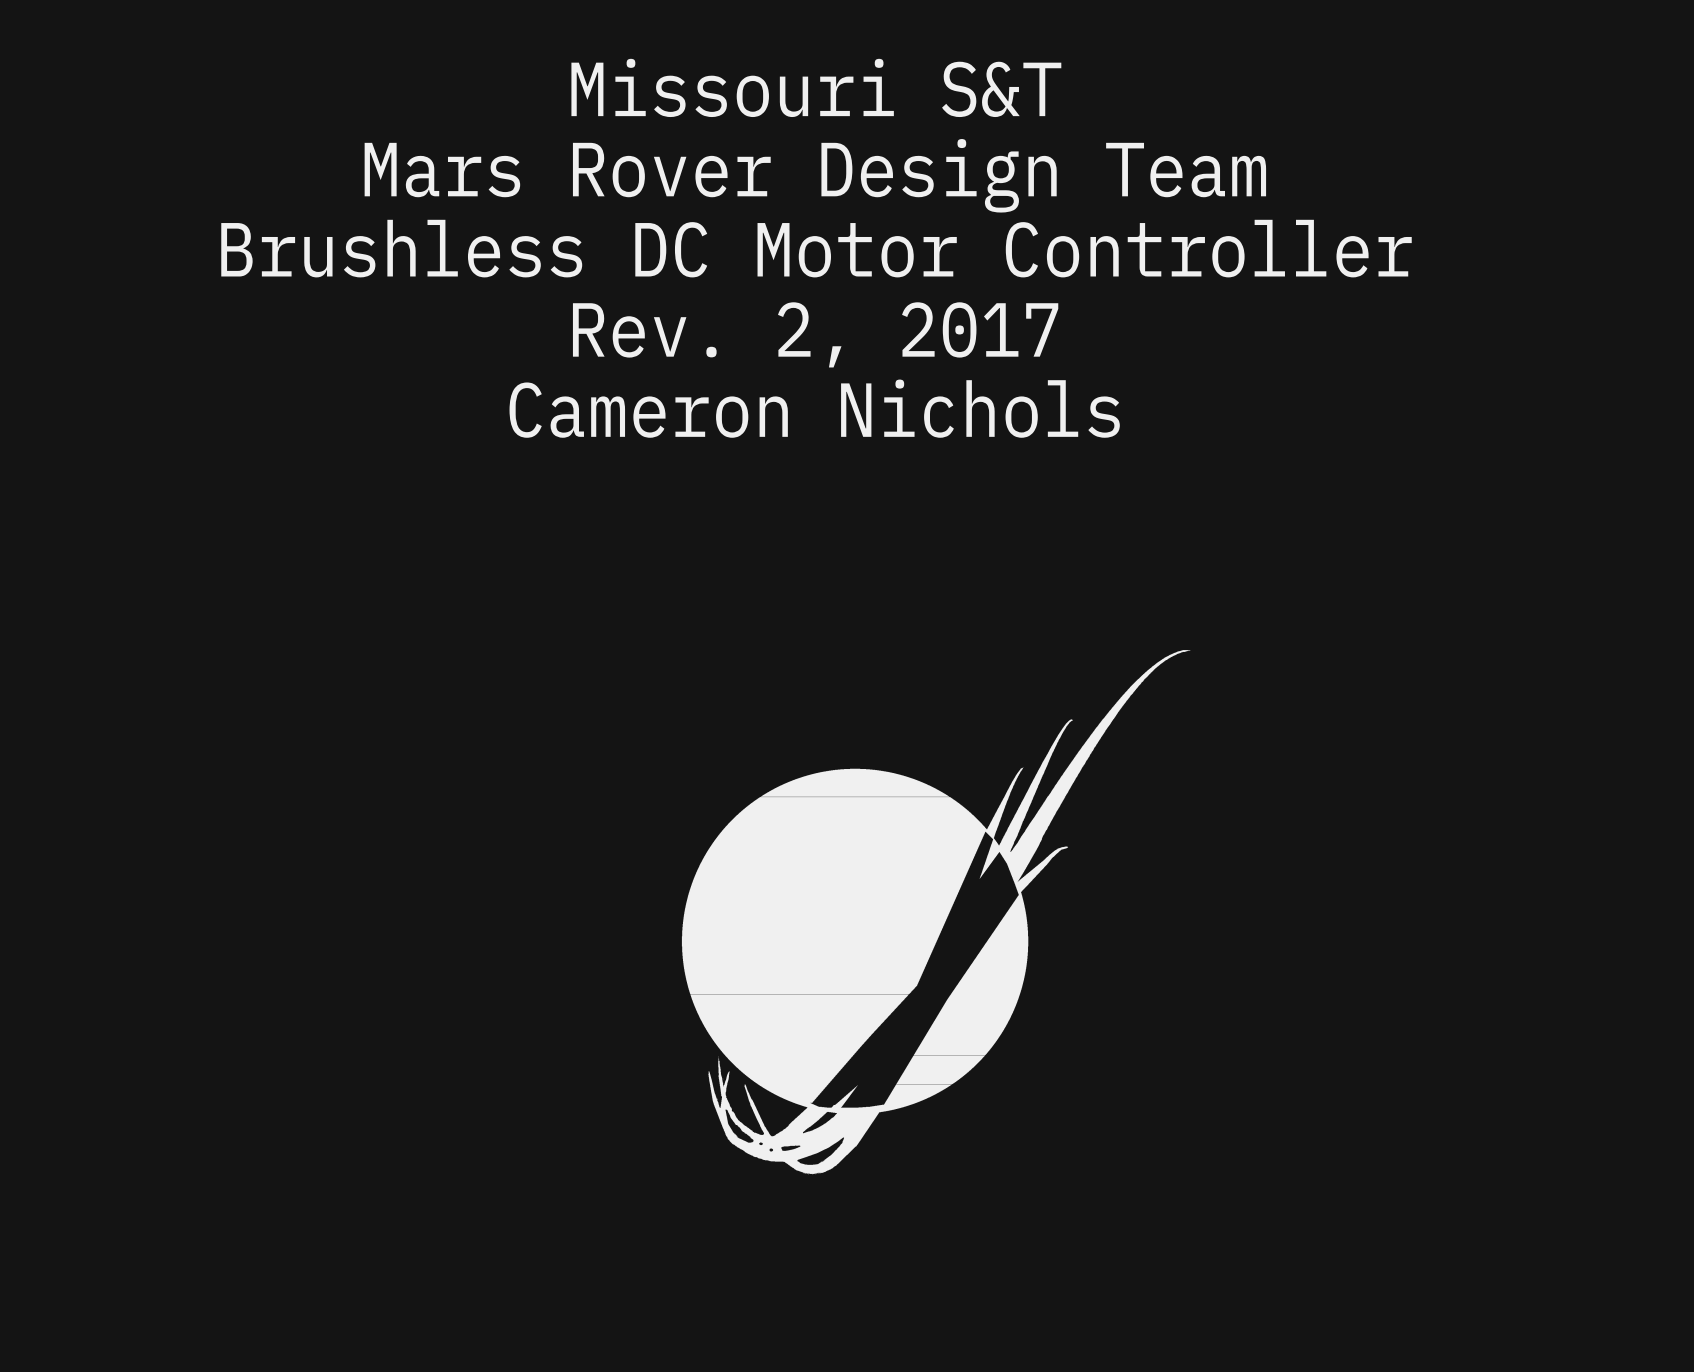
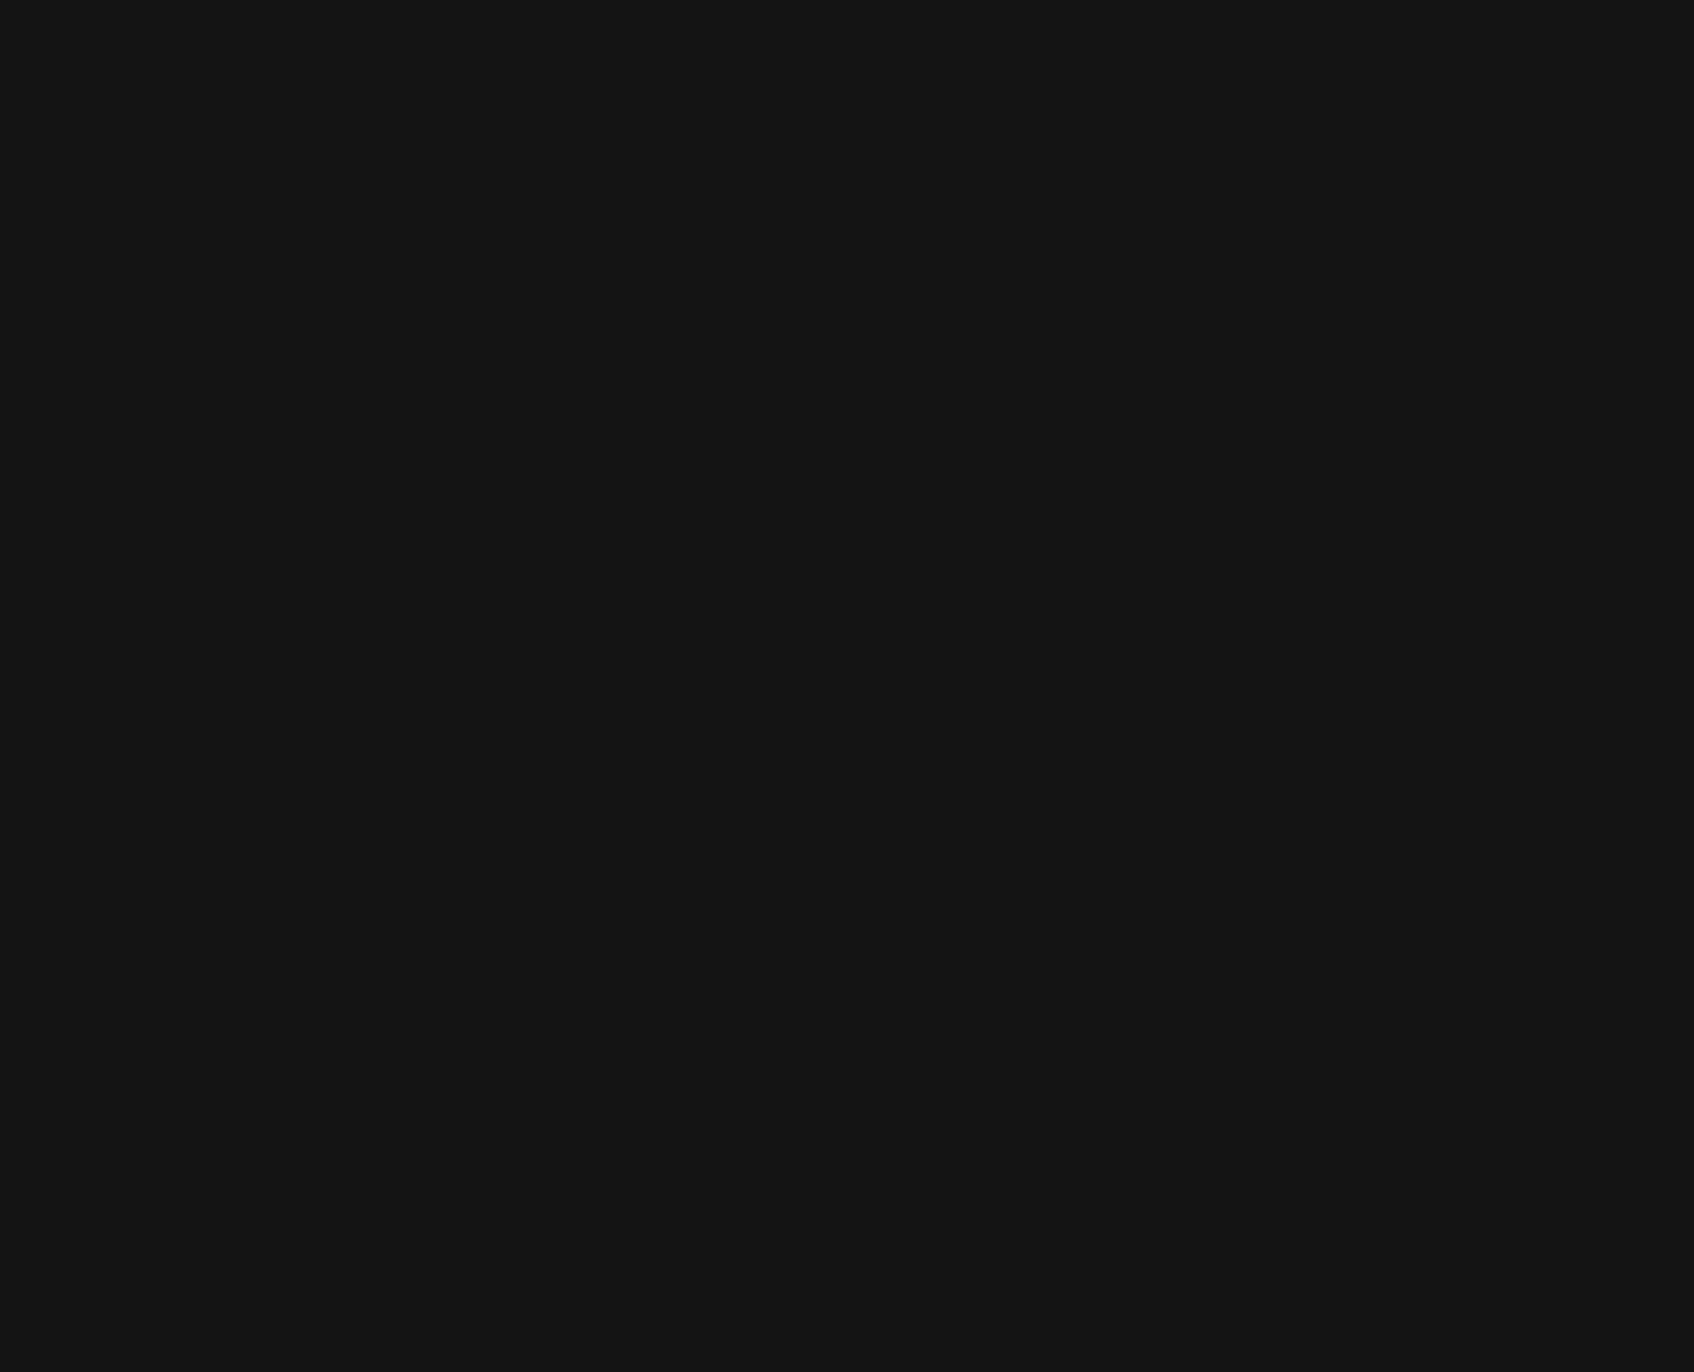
text: Missouri S&T (816, 87) -> none
text: Mars Rover Design Team (815, 175) -> none
text: Brushless DC Motor Controller (816, 248) -> none
text: Rev. 2, 2017 (815, 334) -> none
text: Cameron Nichols (814, 408) -> none
drawing: [681, 650, 1191, 1175] -> none

